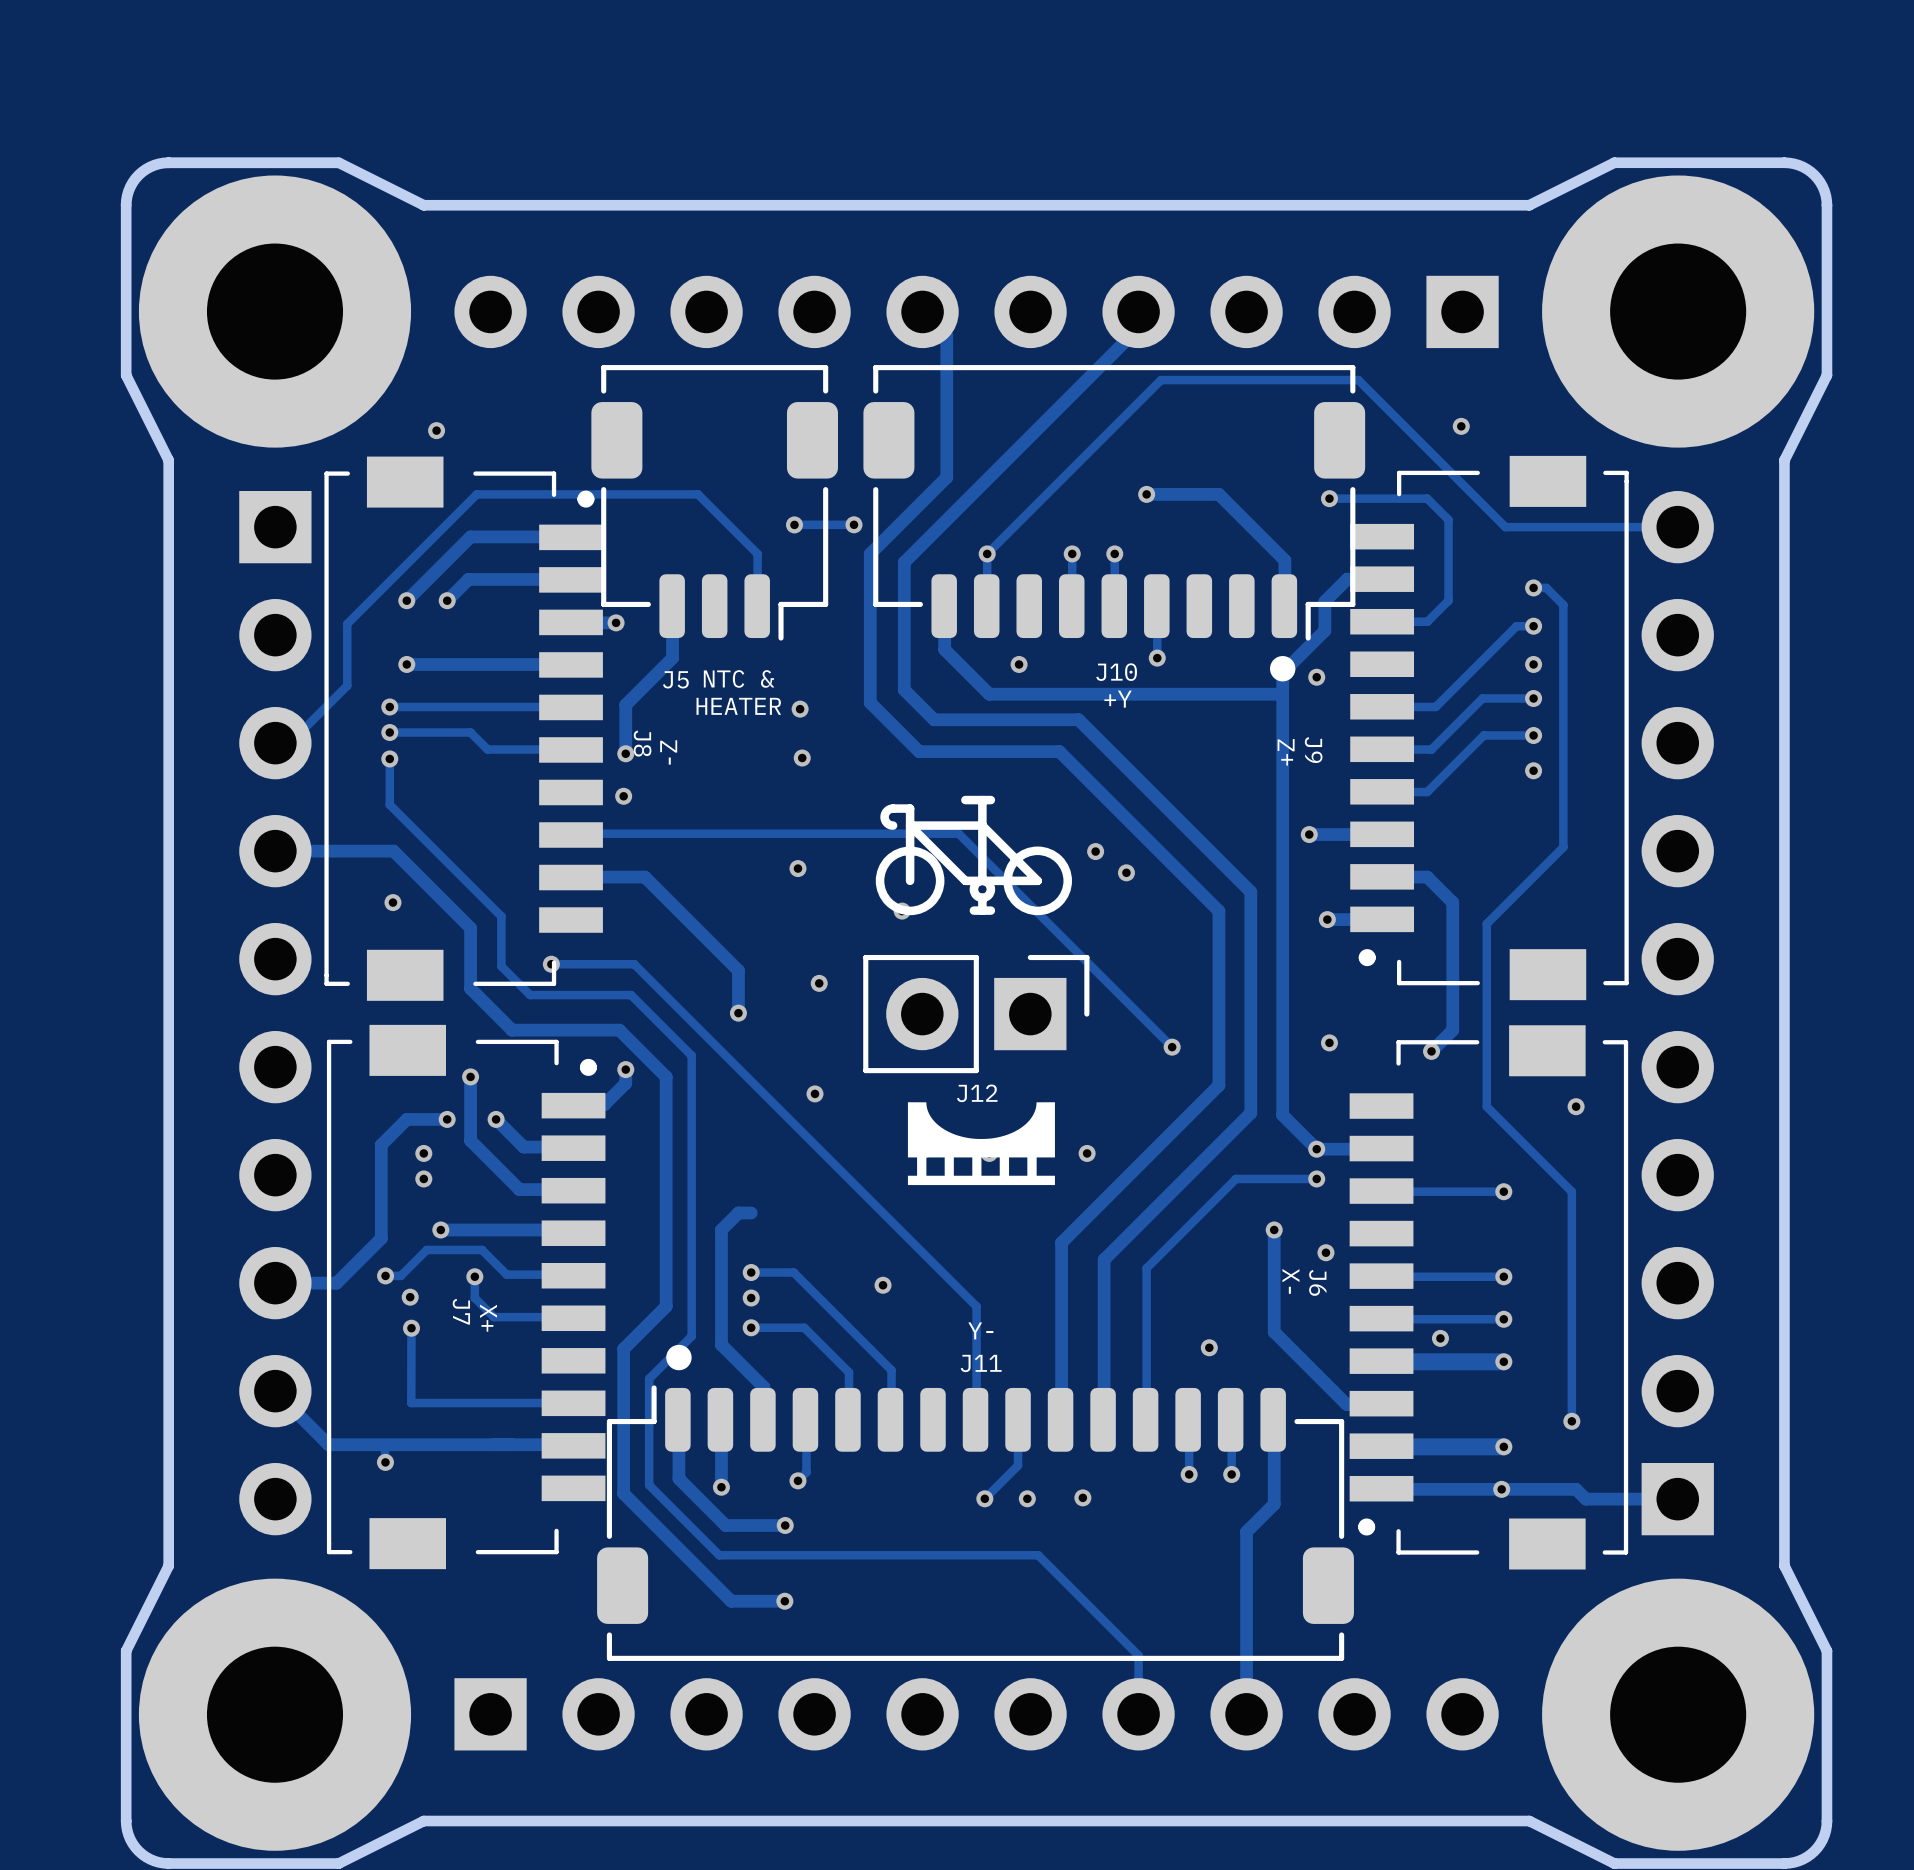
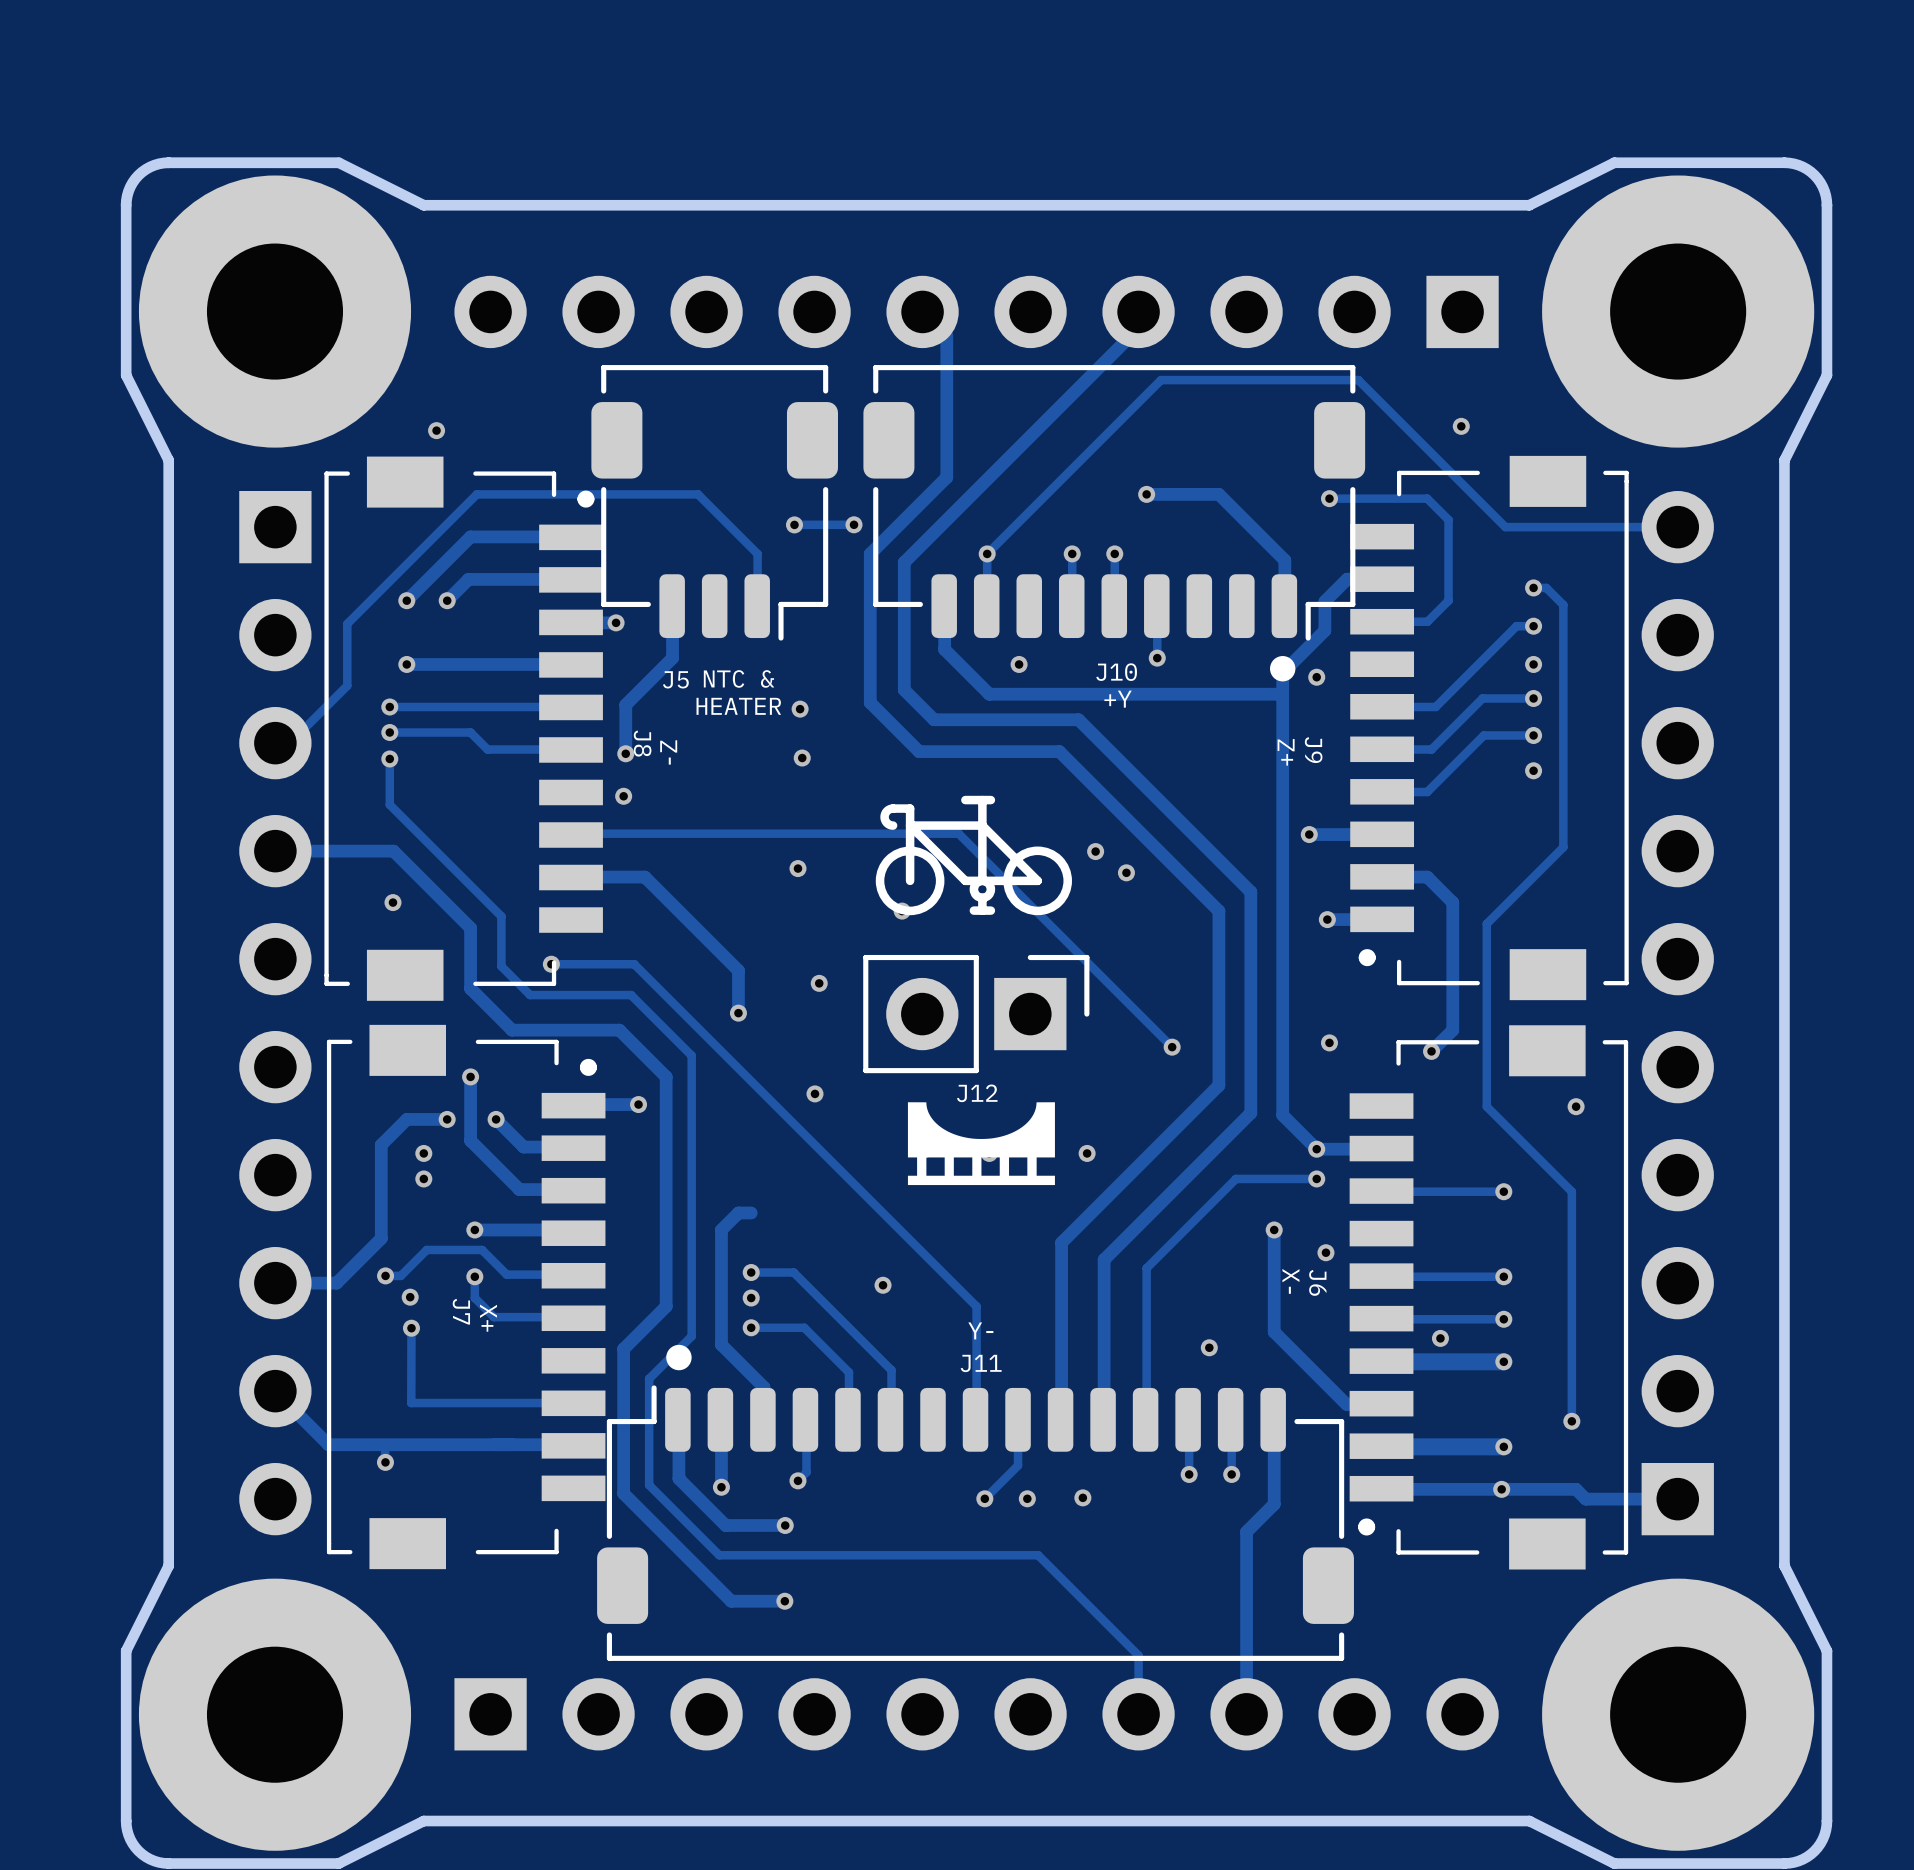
track: (625, 1069) (625, 1083) (604, 1104) -> (638, 1104) (604, 1104)
via position: (625, 1069) -> (638, 1104)
via position: (440, 1229) -> (474, 1229)
track: (474, 1229) (440, 1229) -> none

